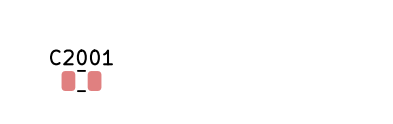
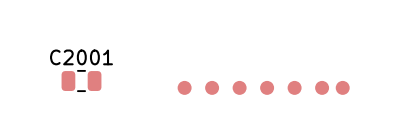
part: none -> (184, 87)
part: none -> (212, 87)
part: none -> (239, 87)
part: none -> (267, 87)
part: none -> (294, 87)
part: none -> (322, 87)
part: none -> (342, 87)

